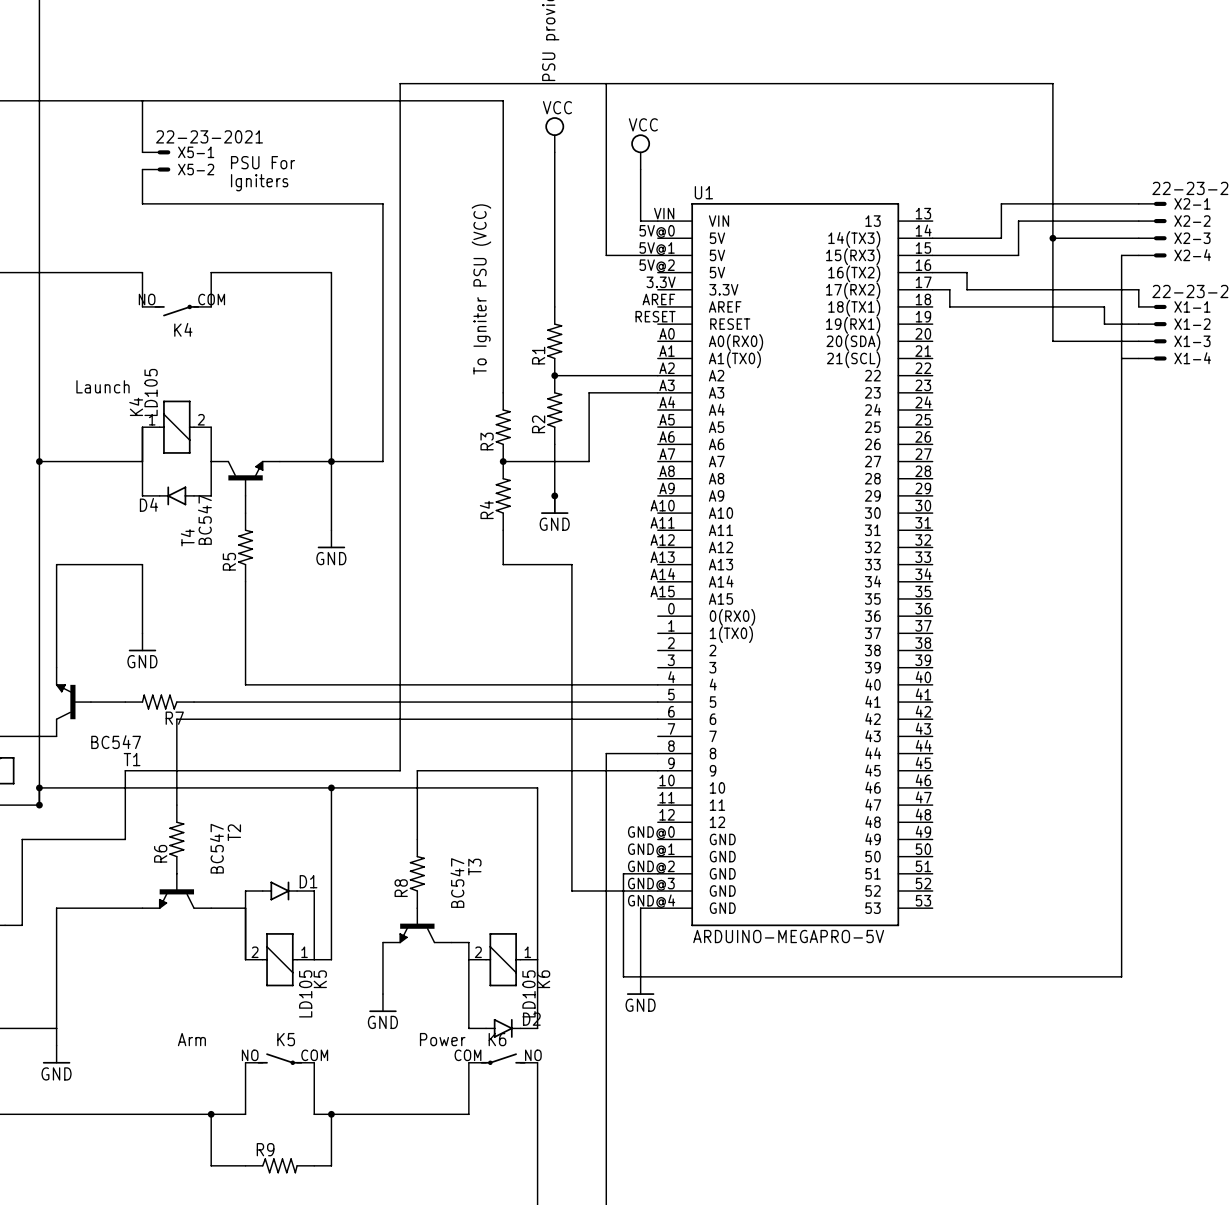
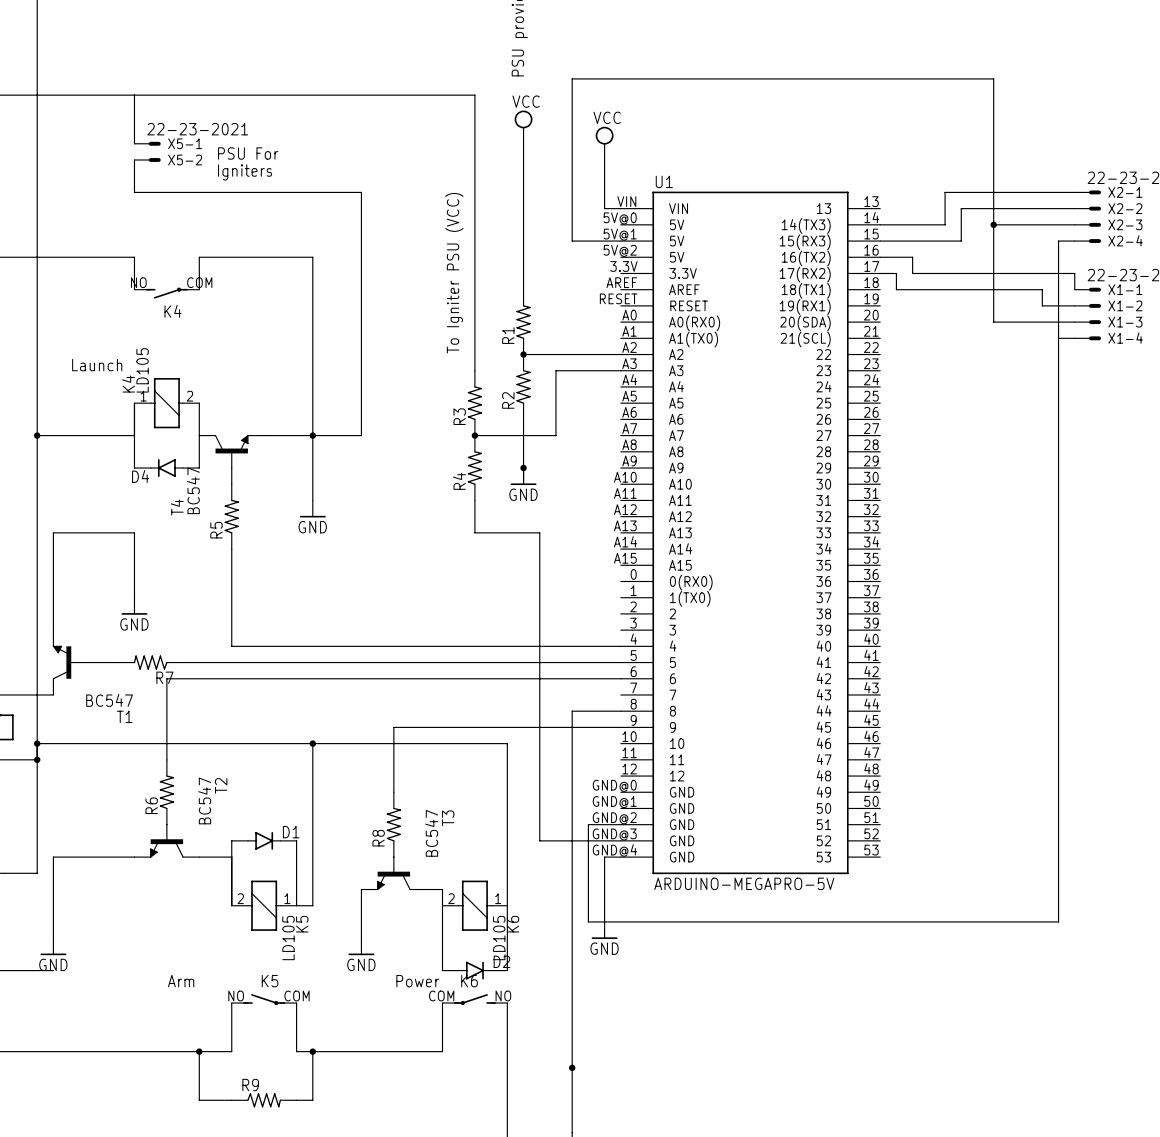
wire: (606, 83) (400, 83) (400, 770) (125, 770) (125, 839) (22, 839) (22, 925) -> (37, 759) (37, 873) (20, 873)
wire: (56, 994) (56, 1045) -> none
power symbol position: GND (56, 1054) -> GND (53, 946)
junction: none -> (572, 1067)

